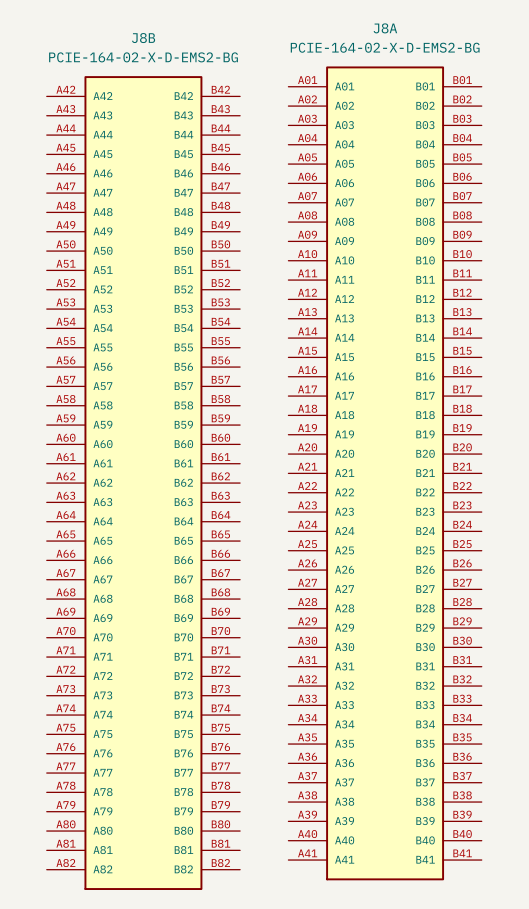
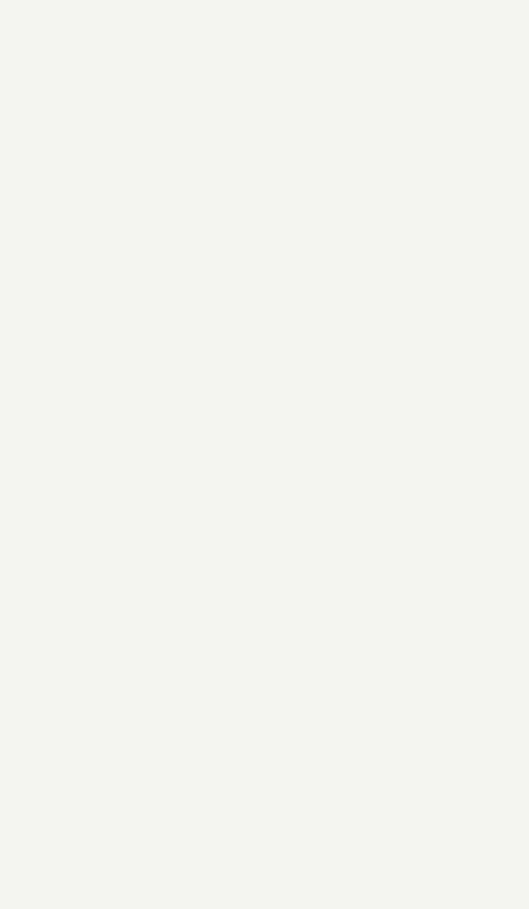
J8A: PCIE-164-02-X-D-EMS2-BG (385, 473) -> none
J8B: PCIE-164-02-X-D-EMS2-BG (143, 483) -> none

